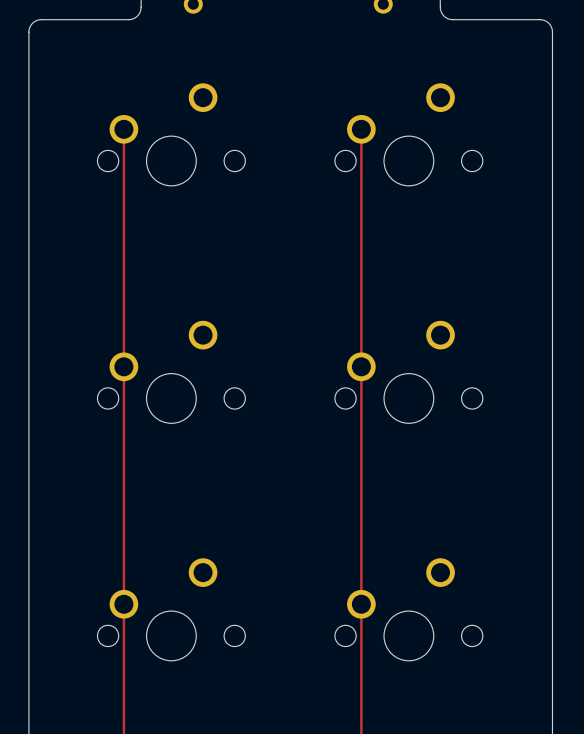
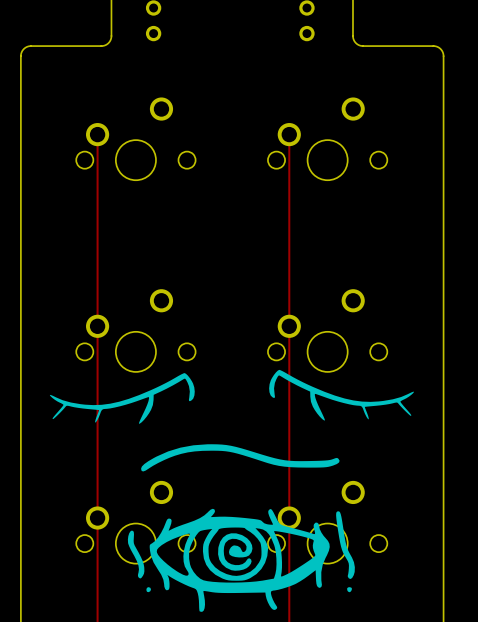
drawing: none -> [269, 369, 414, 421]
drawing: none -> [49, 373, 195, 424]
drawing: none -> [141, 444, 340, 472]
drawing: none -> [127, 508, 355, 612]

